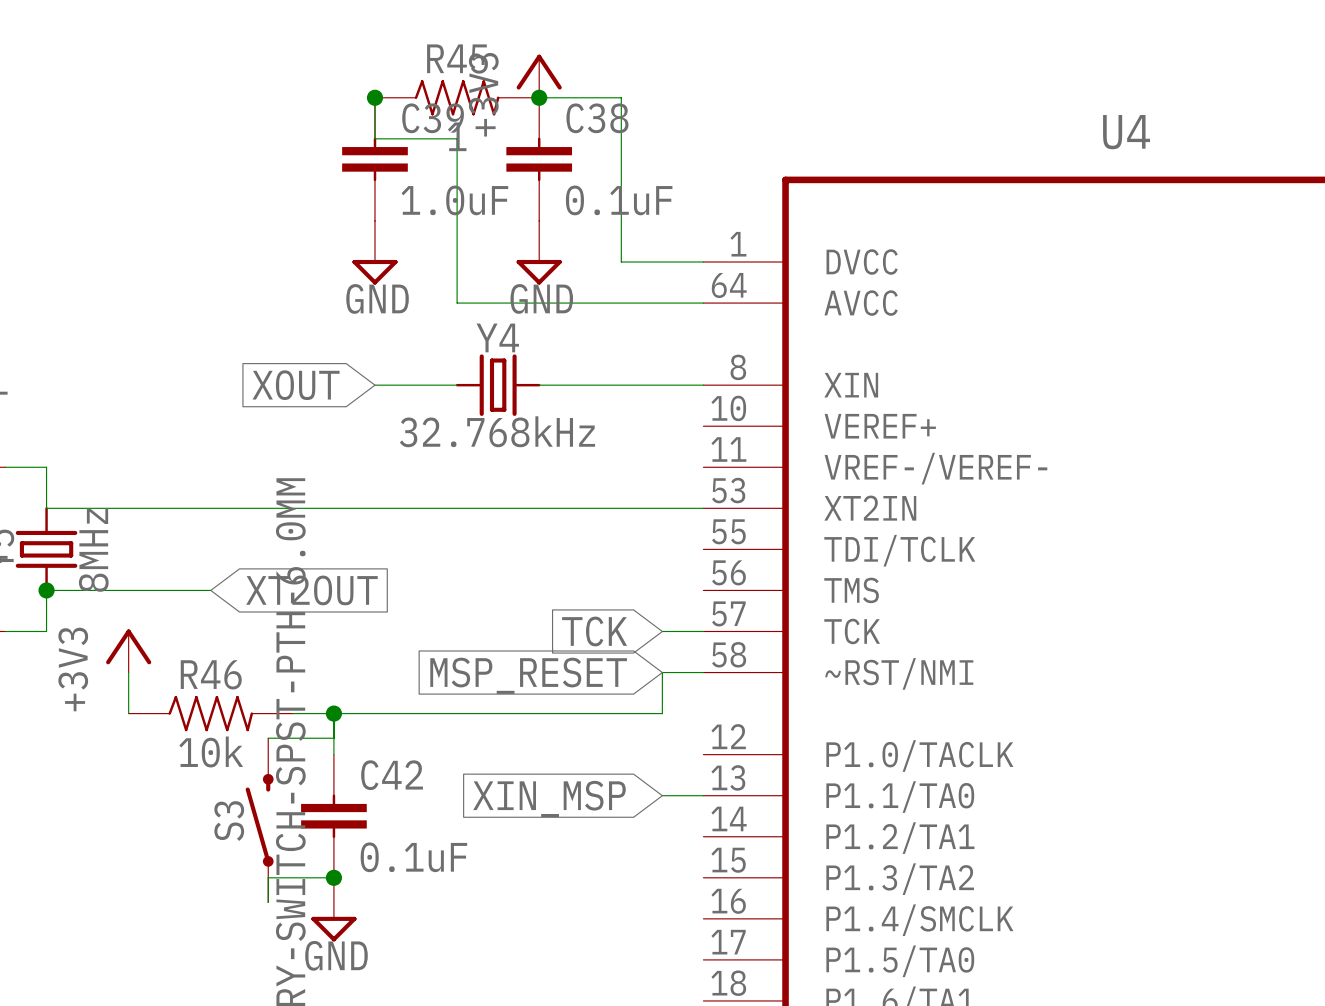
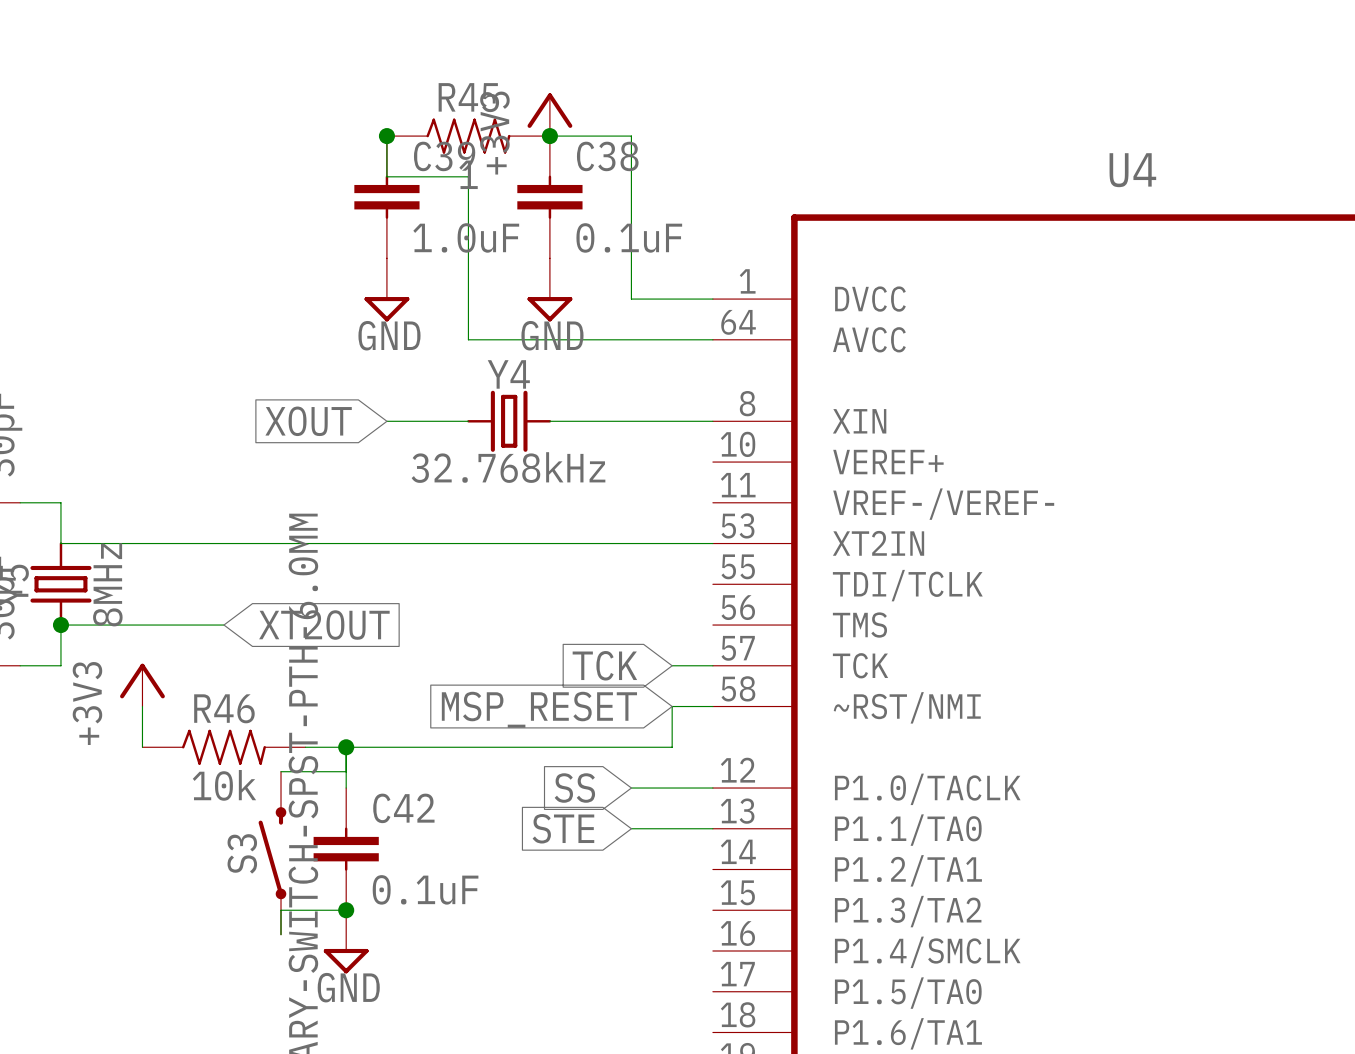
global label: none -> SS (574, 788)
wire: none -> (631, 788) (712, 788)
global label: none -> STE (563, 828)
wire: none -> (631, 828) (672, 828)
global label: XIN_MSP (549, 798) -> none

